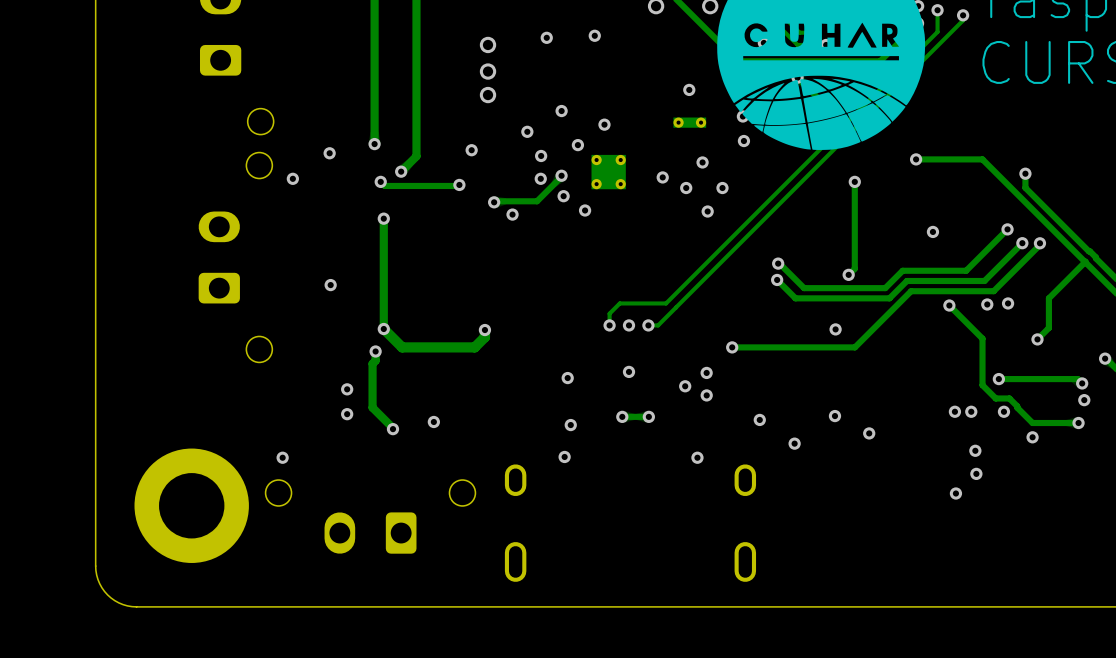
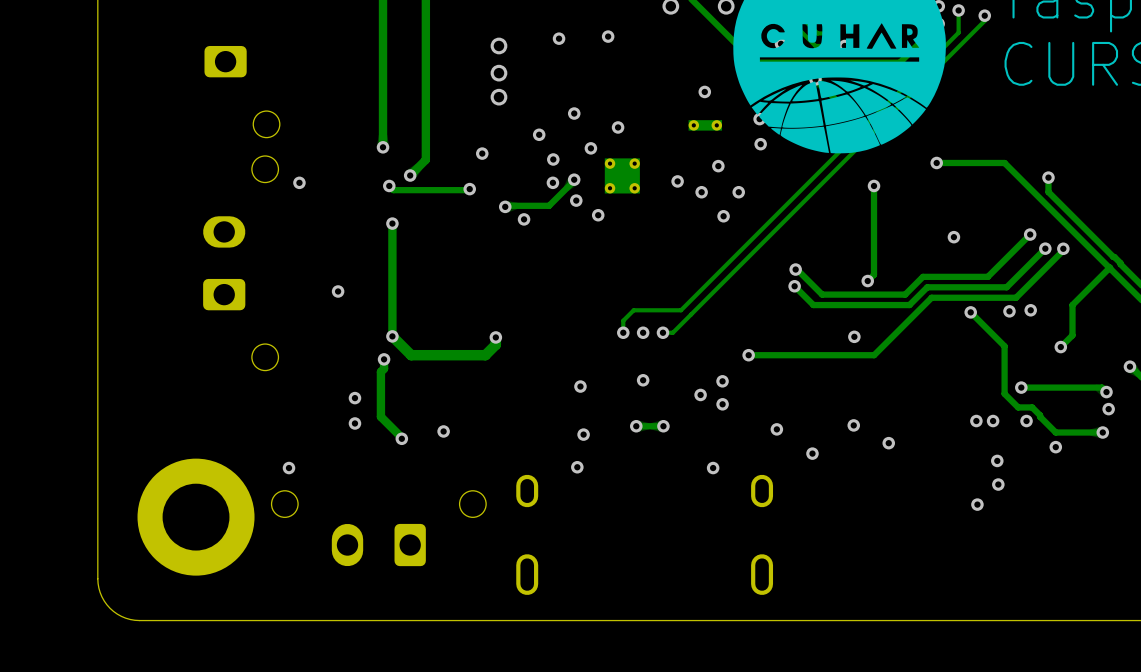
via: (329, 153) -> none

